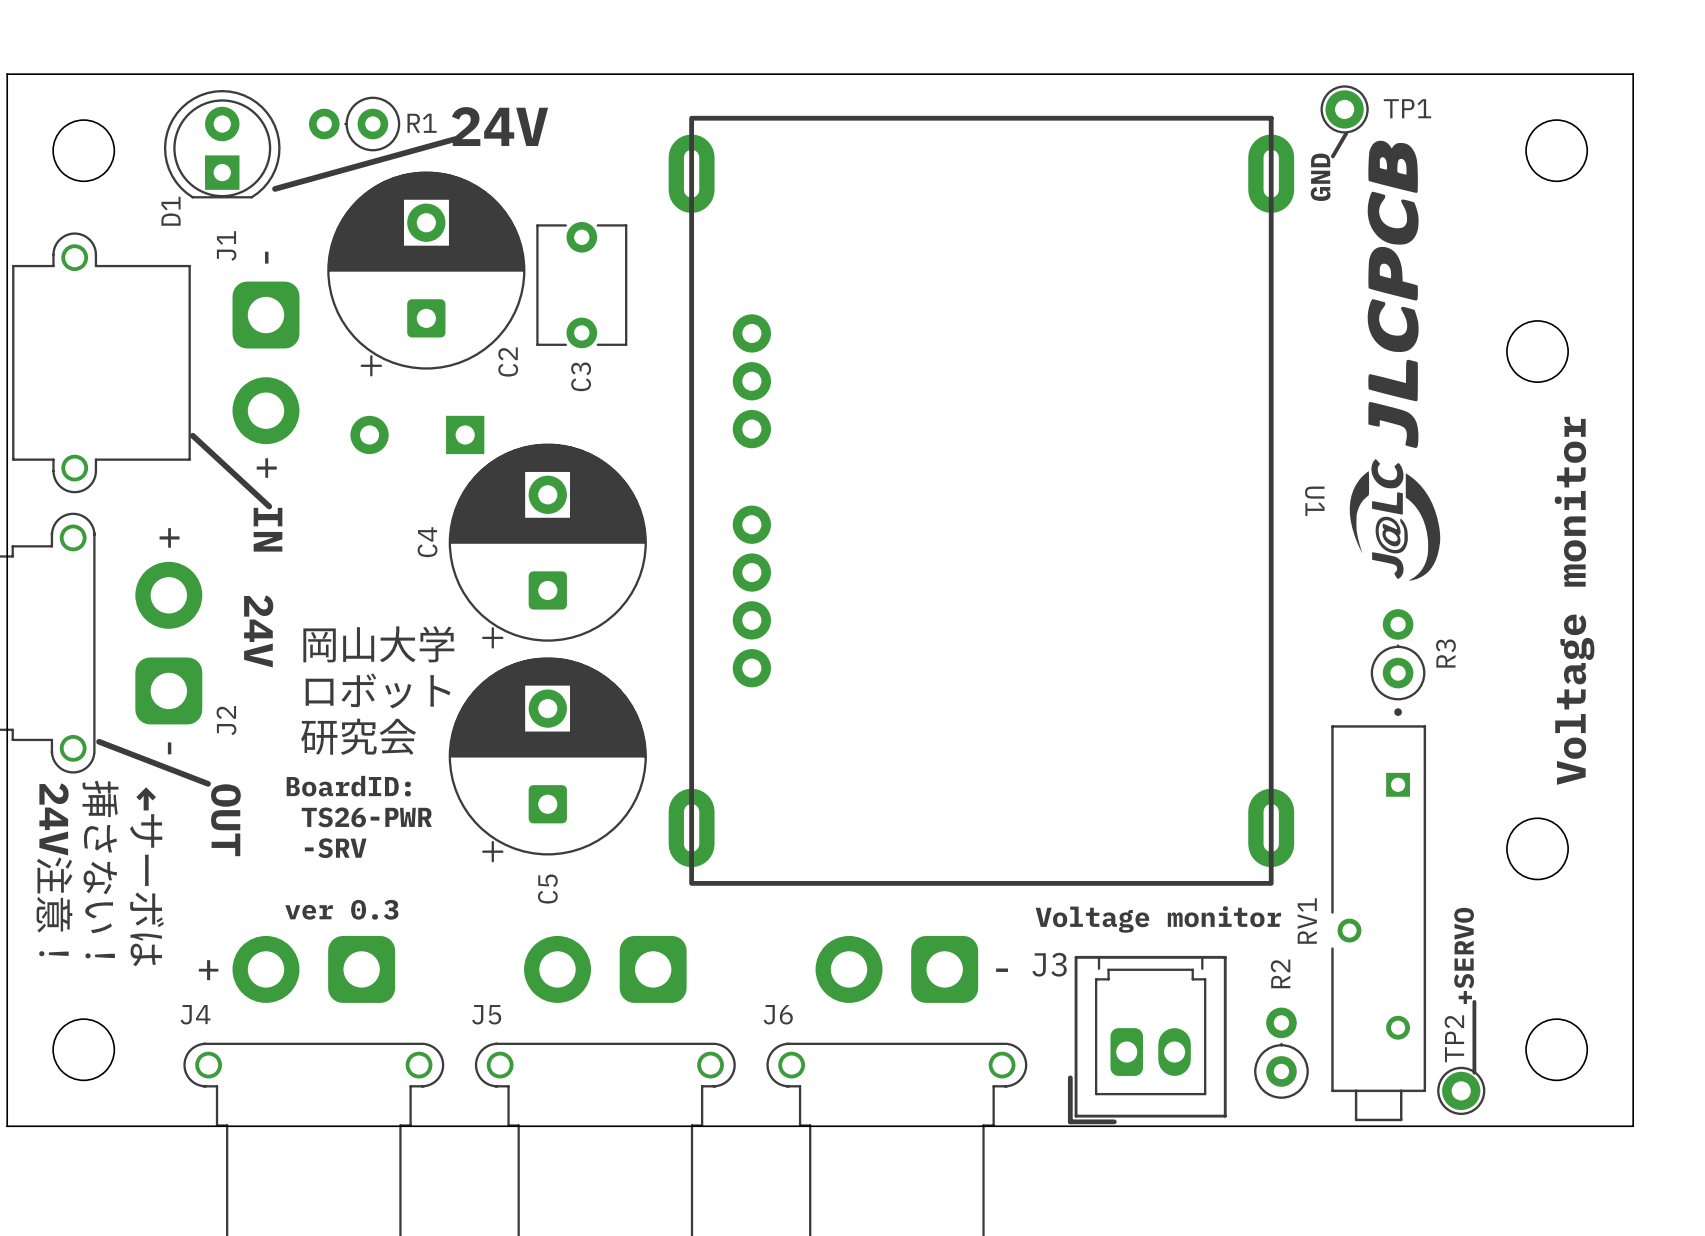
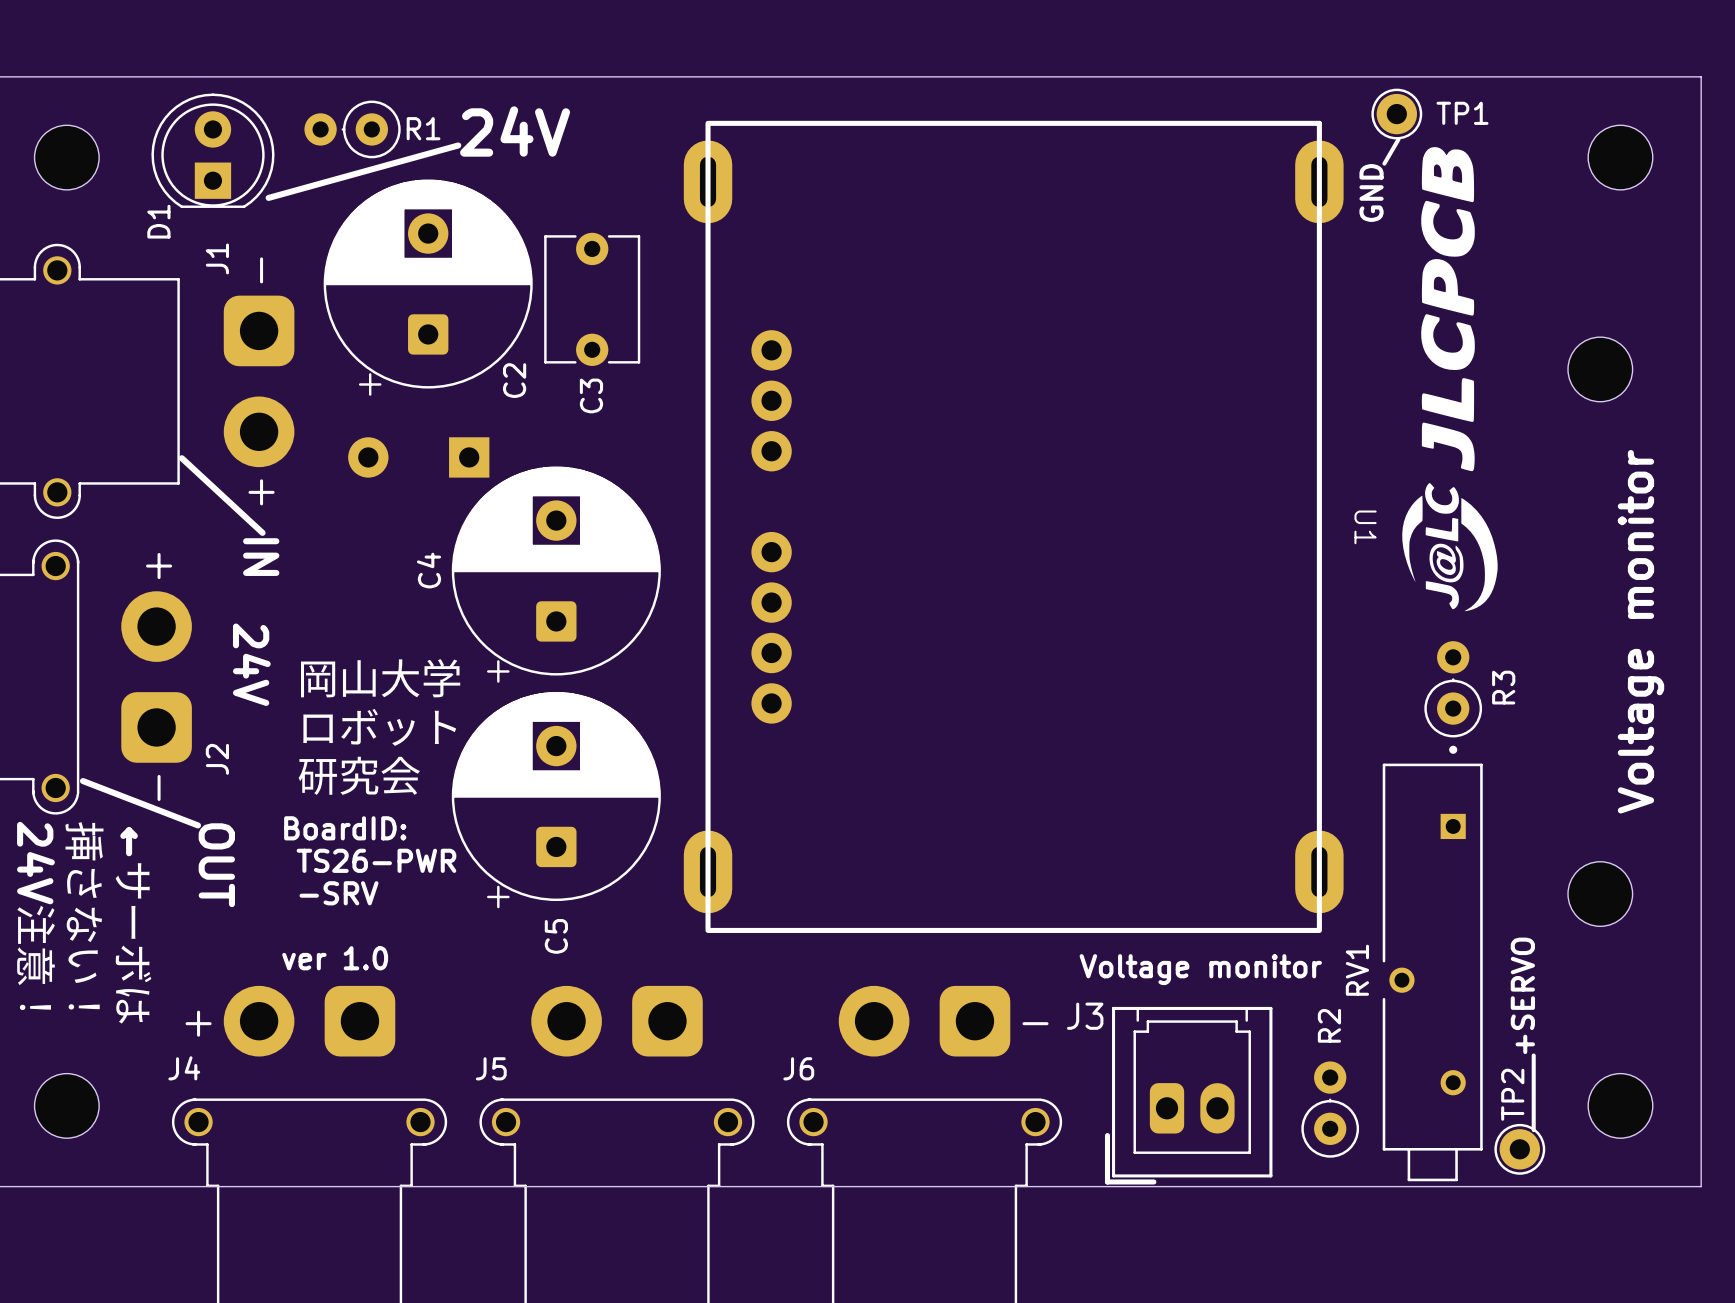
text: ver 0.3 (341, 909) -> ver 1.0 (335, 958)

